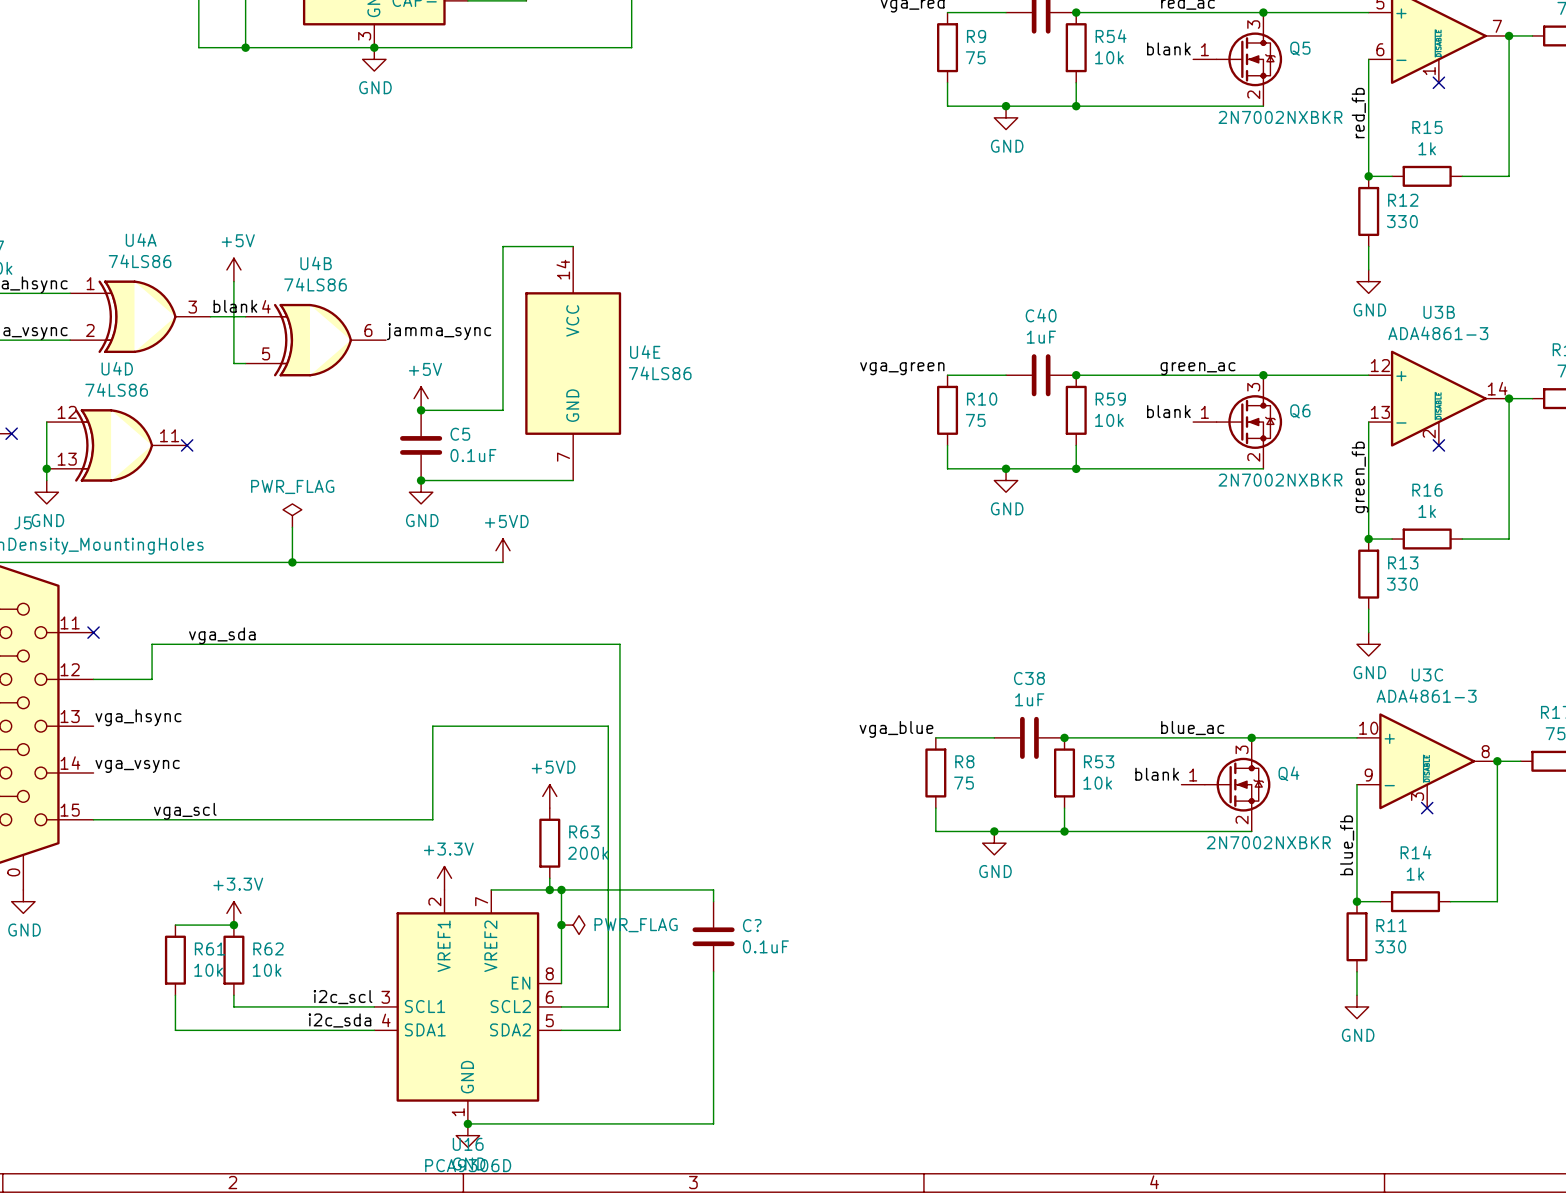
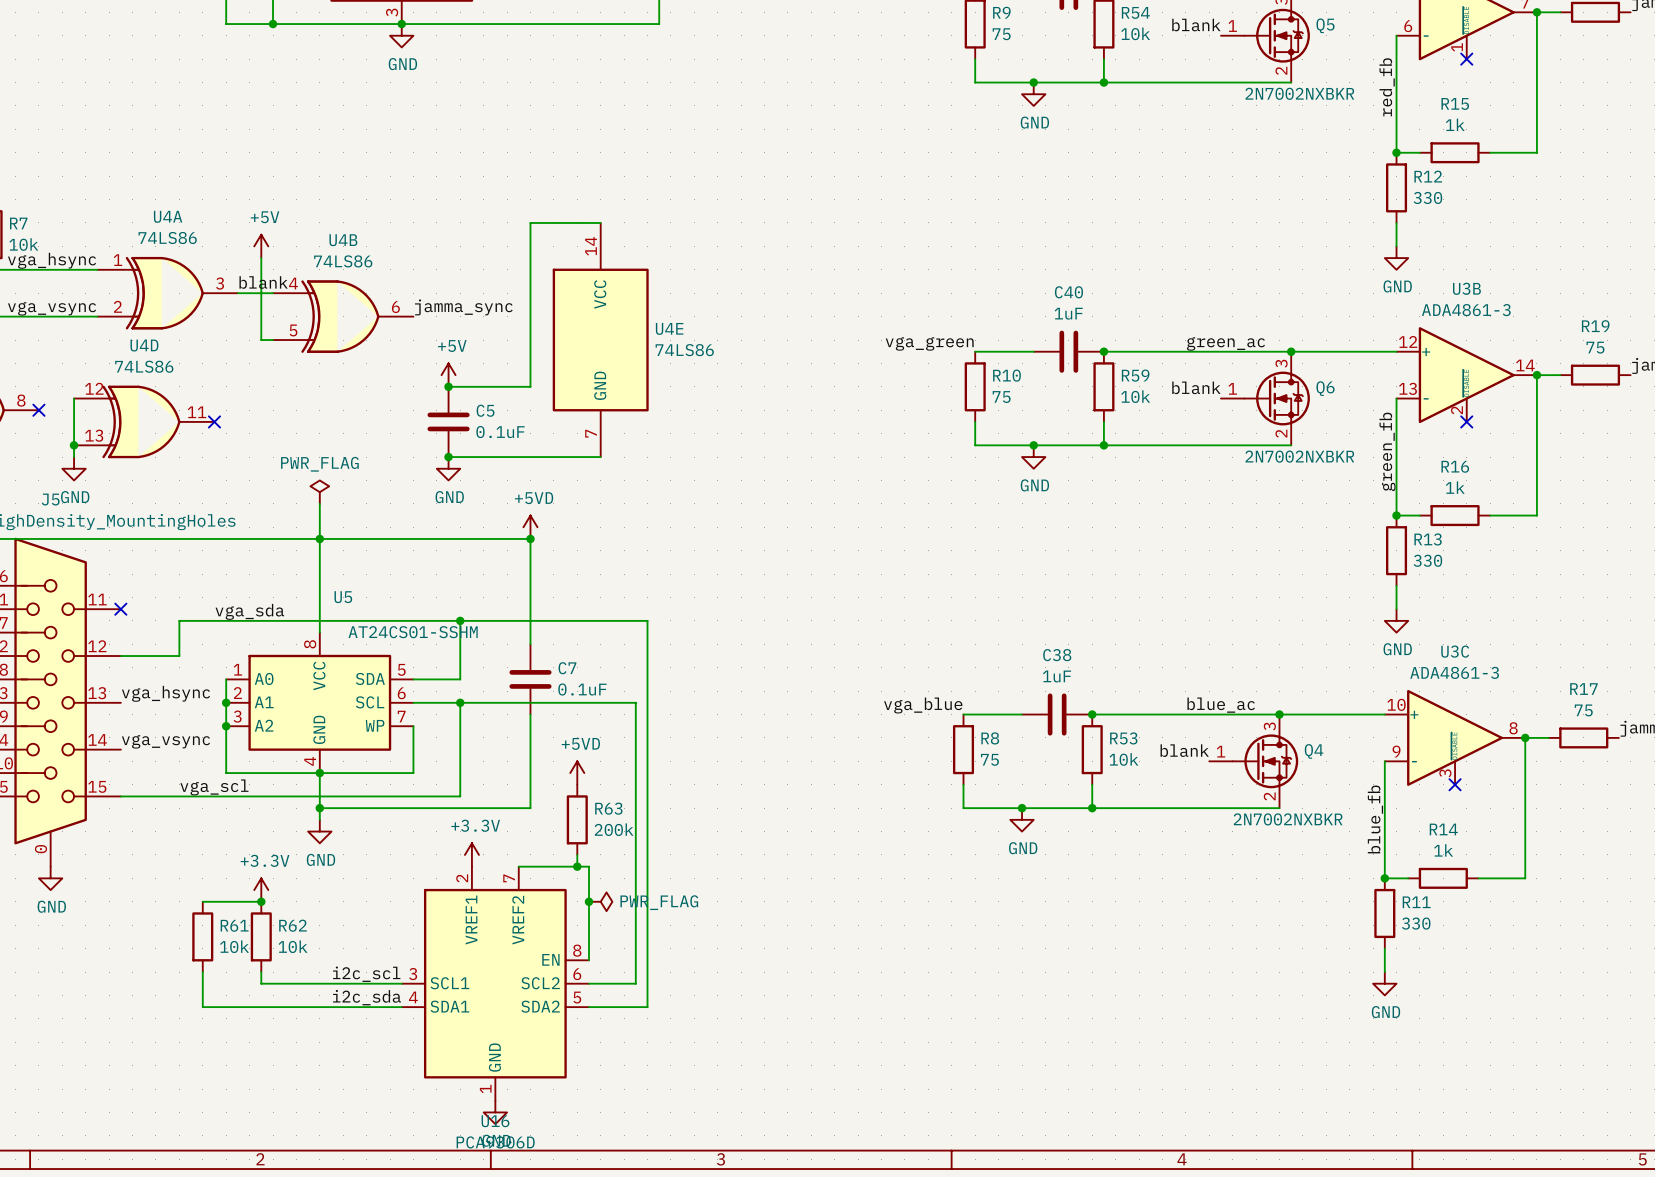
wire: none -> (319, 538) (319, 632)
wire: none -> (530, 538) (530, 644)
junction: none -> (530, 538)
wire: none -> (460, 620) (460, 679) (413, 679)
junction: none -> (460, 620)
wire: none -> (226, 679) (226, 773) (413, 773) (413, 726)
C7: none -> 0.1uF (530, 679)
junction: none -> (226, 702)
U5: none -> AT24CS01-SSHM (319, 702)
wire: none -> (413, 702) (460, 702)
junction: none -> (460, 702)
wire: none -> (530, 714) (530, 808) (319, 808)
junction: none -> (226, 726)
wire: none -> (319, 773) (319, 819)
junction: none -> (319, 773)
junction: none -> (319, 808)
power symbol: none -> GND (319, 831)
wire: (561, 889) (713, 889) (713, 901) -> none
junction: (561, 889) -> none
C?: 0.1uF (713, 936) -> none
wire: (713, 971) (713, 1123) (467, 1123) -> none
junction: (467, 1123) -> none

